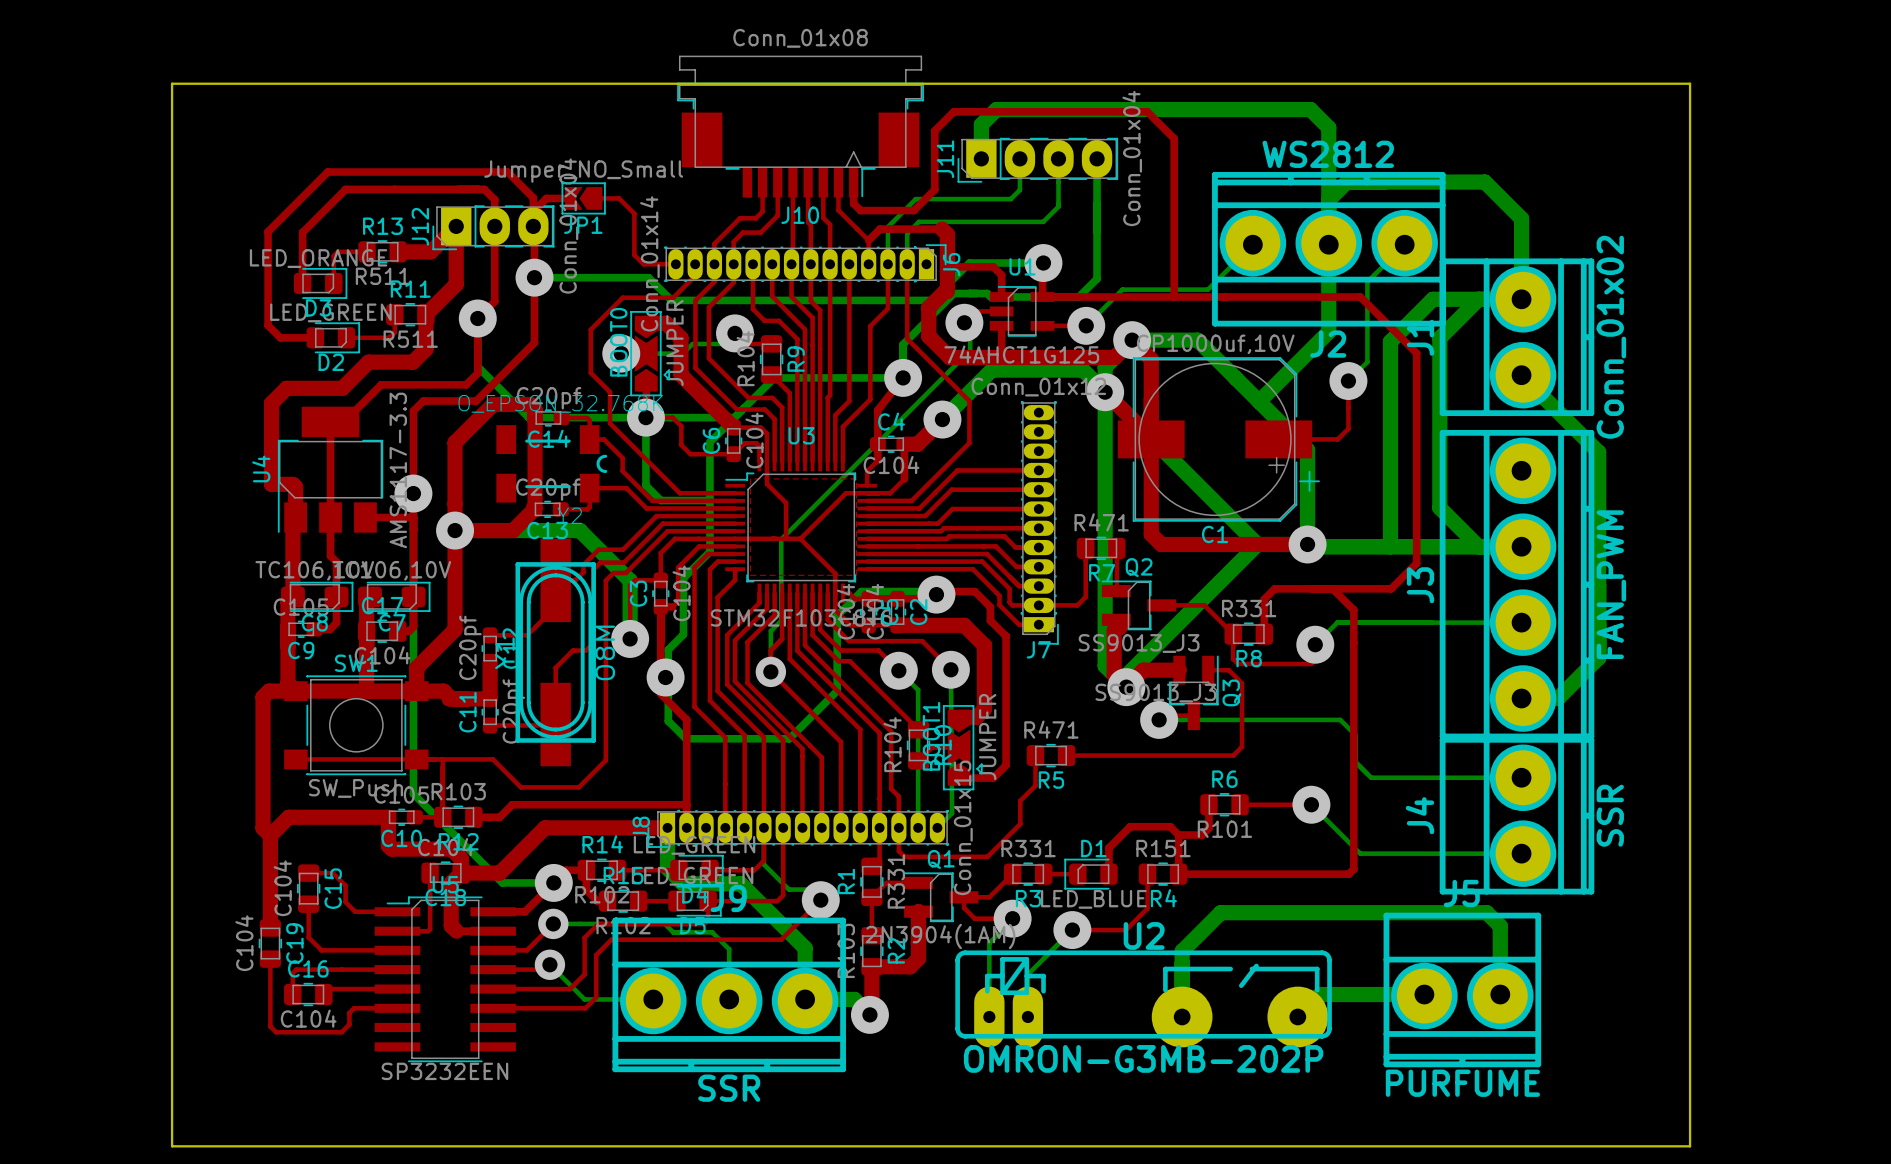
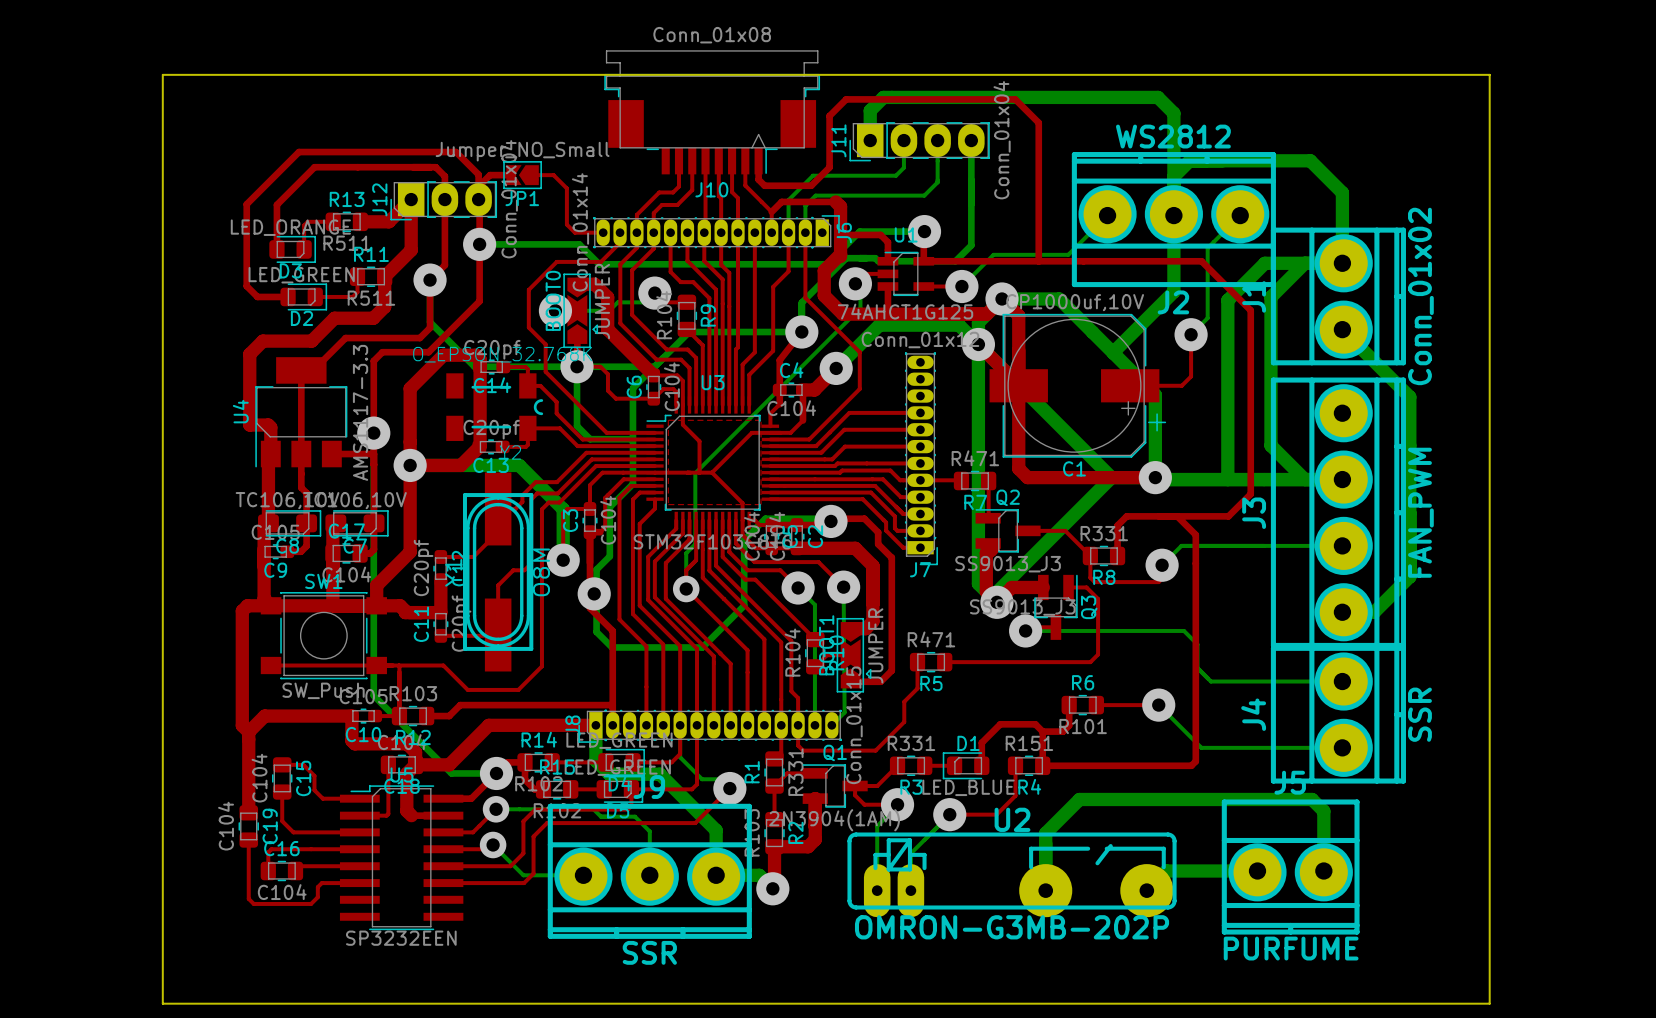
top track: (1085, 548) (1085, 597) (1077, 605) (1038, 605) -> (961, 480) (920, 480)

